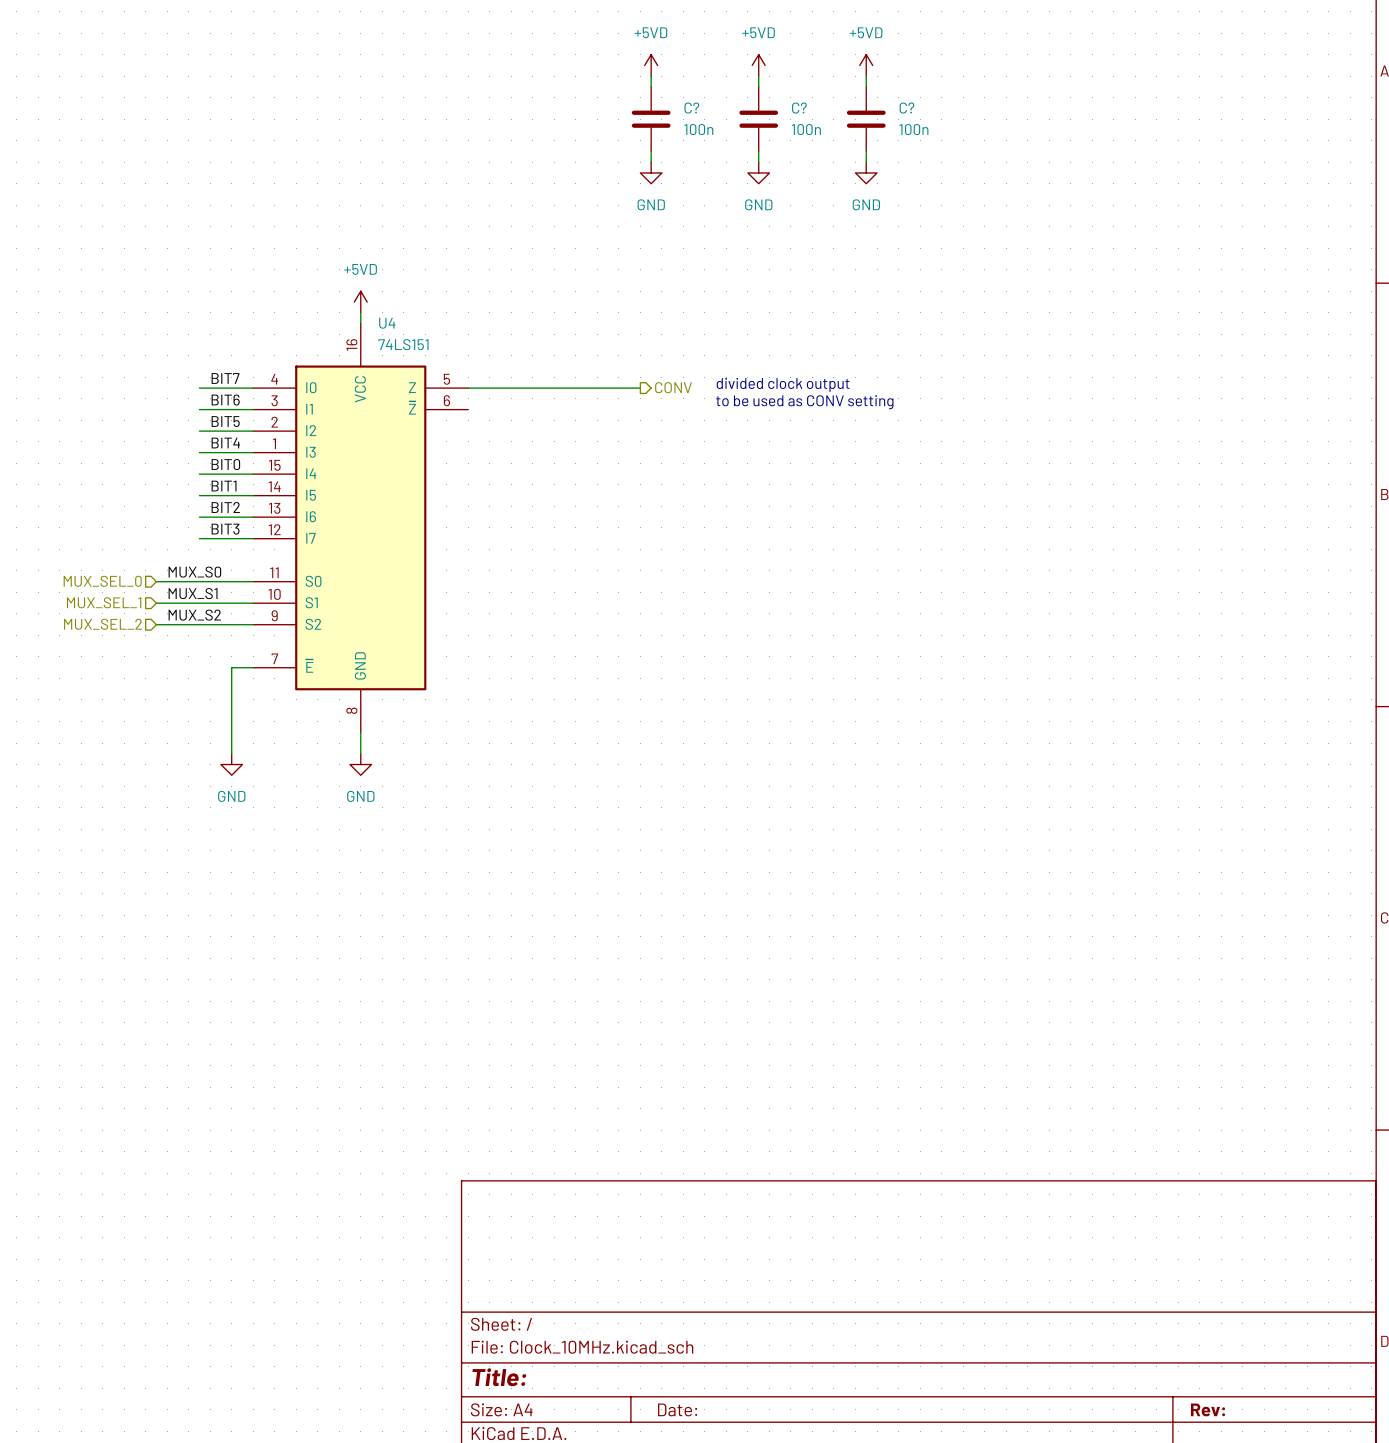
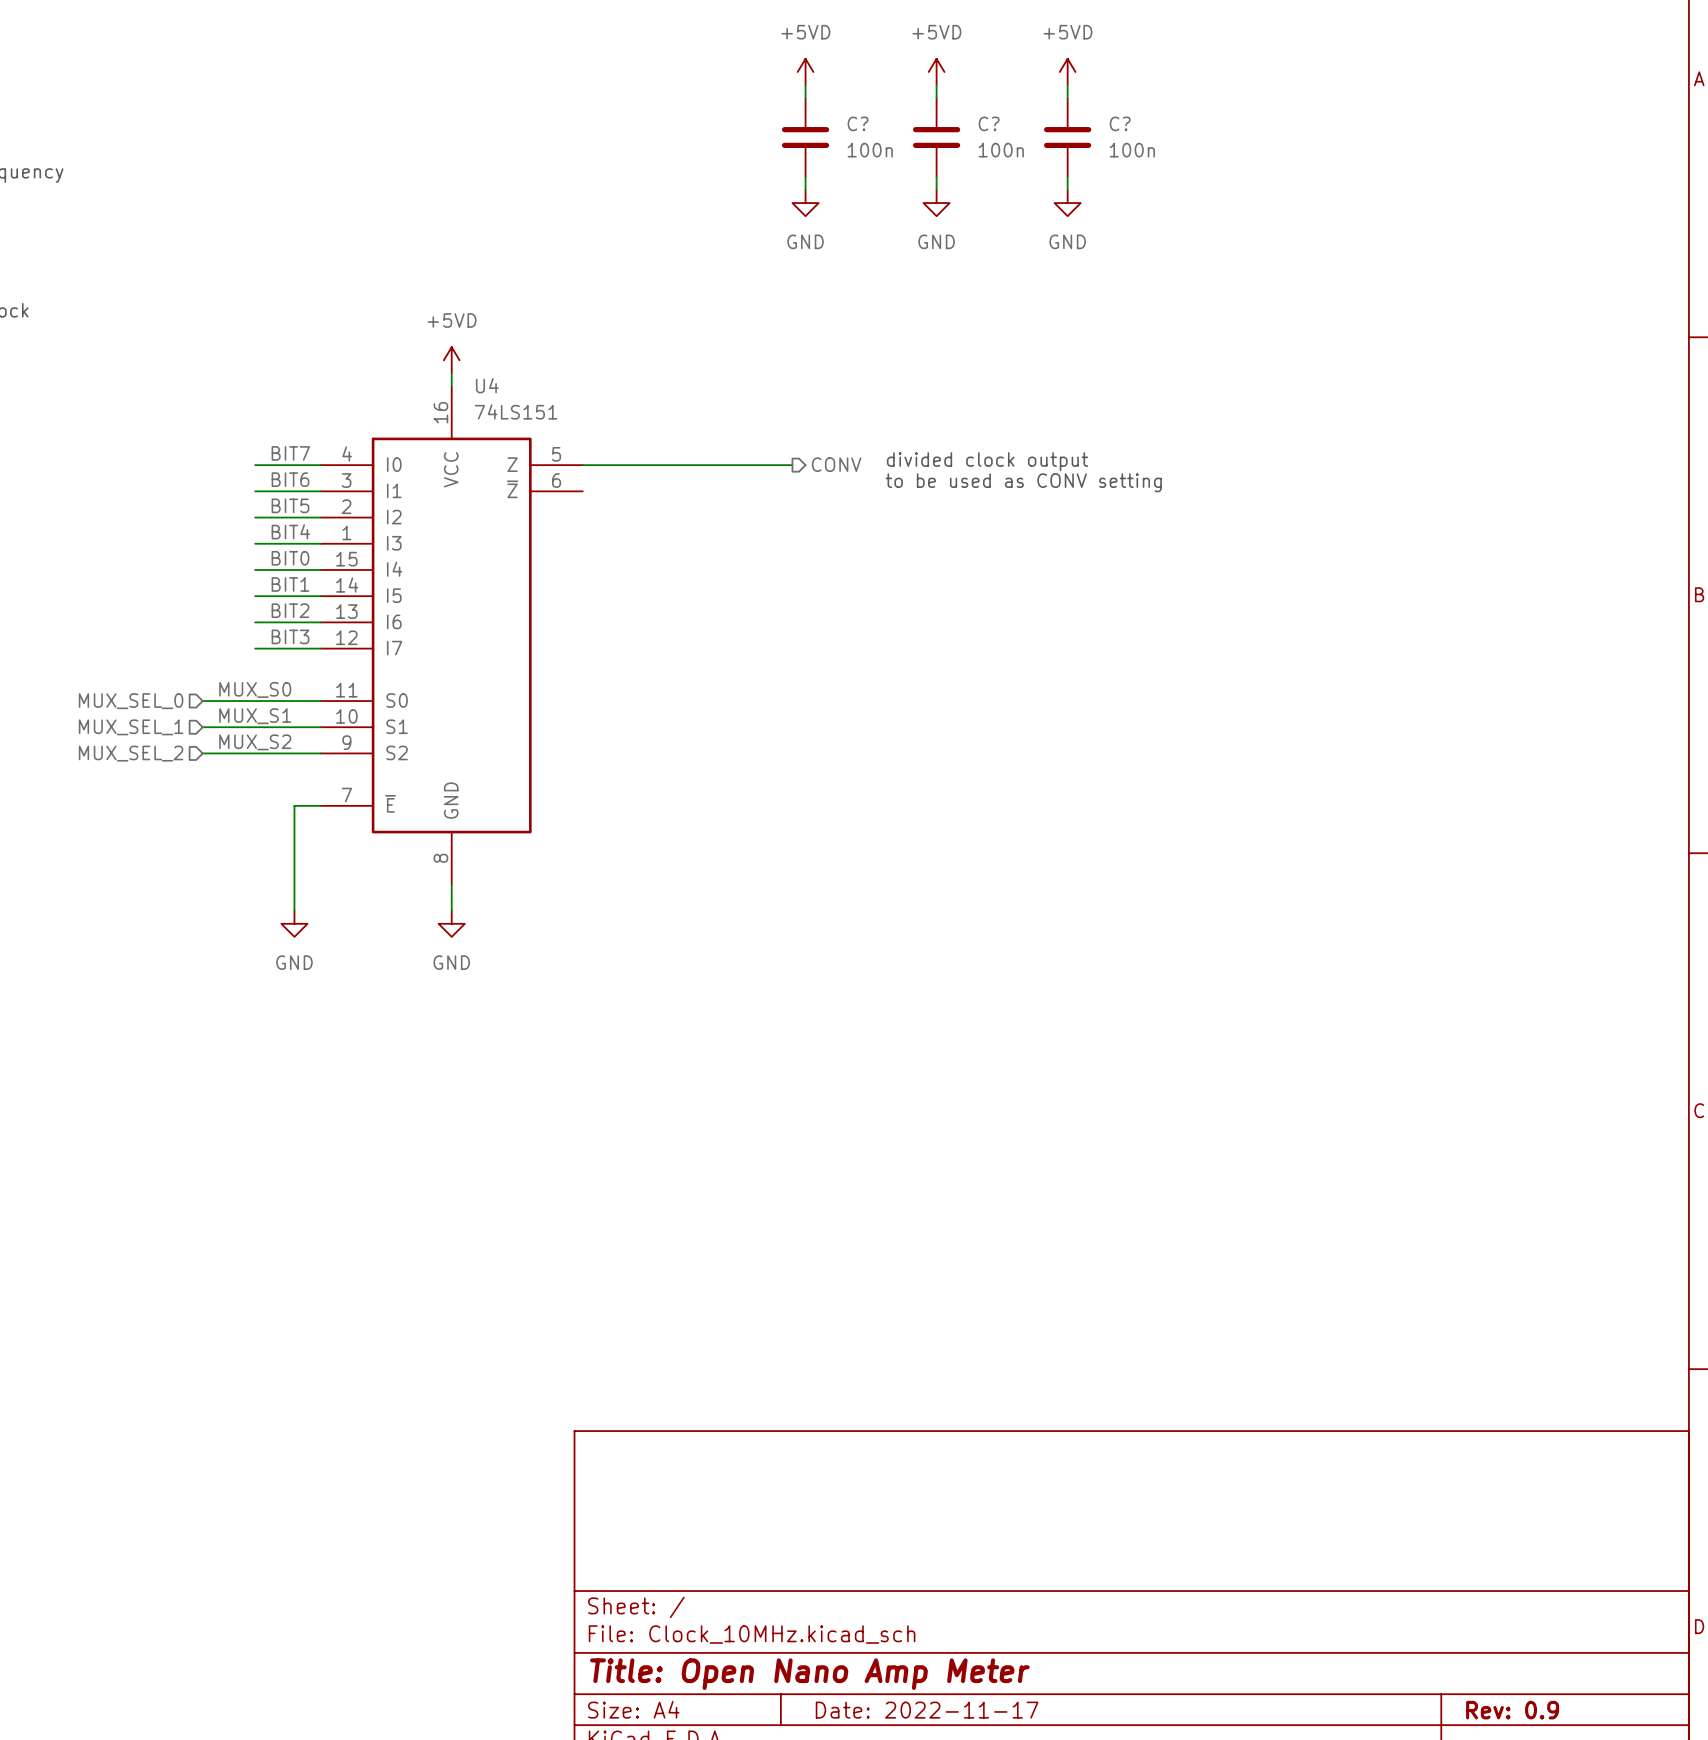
title block: Title: (499, 1377) -> Title: Open Nano Amp Meter (809, 1674)
title block: Date: (677, 1409) -> Date: 2022-11-17 (927, 1710)
title block: Rev: (1207, 1409) -> Rev: 0.9 (1512, 1710)

